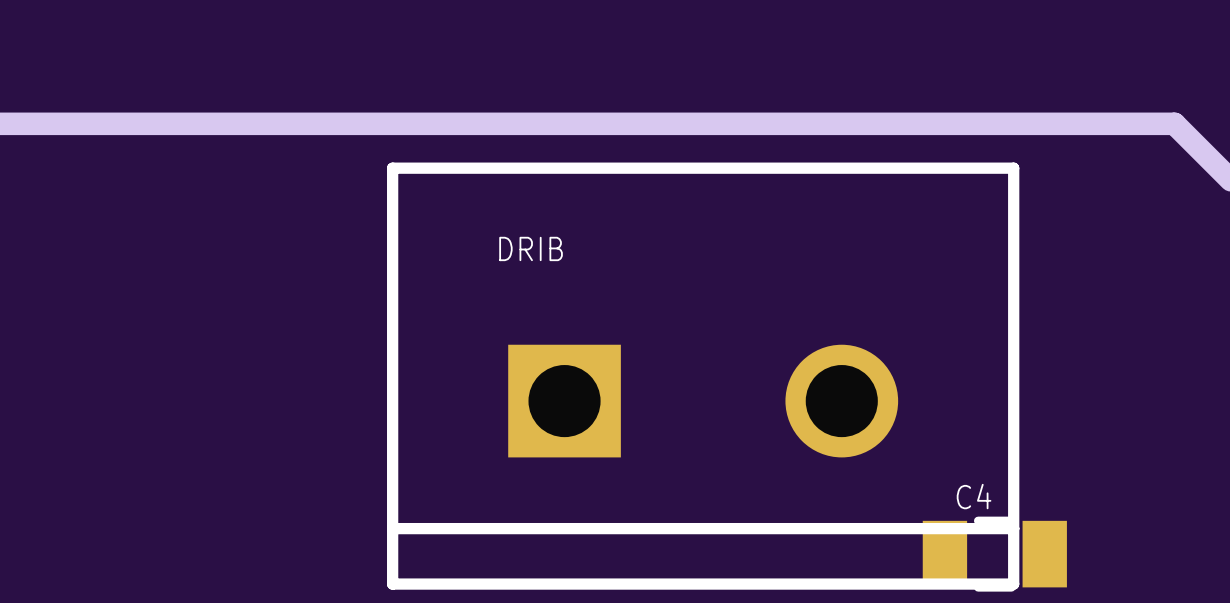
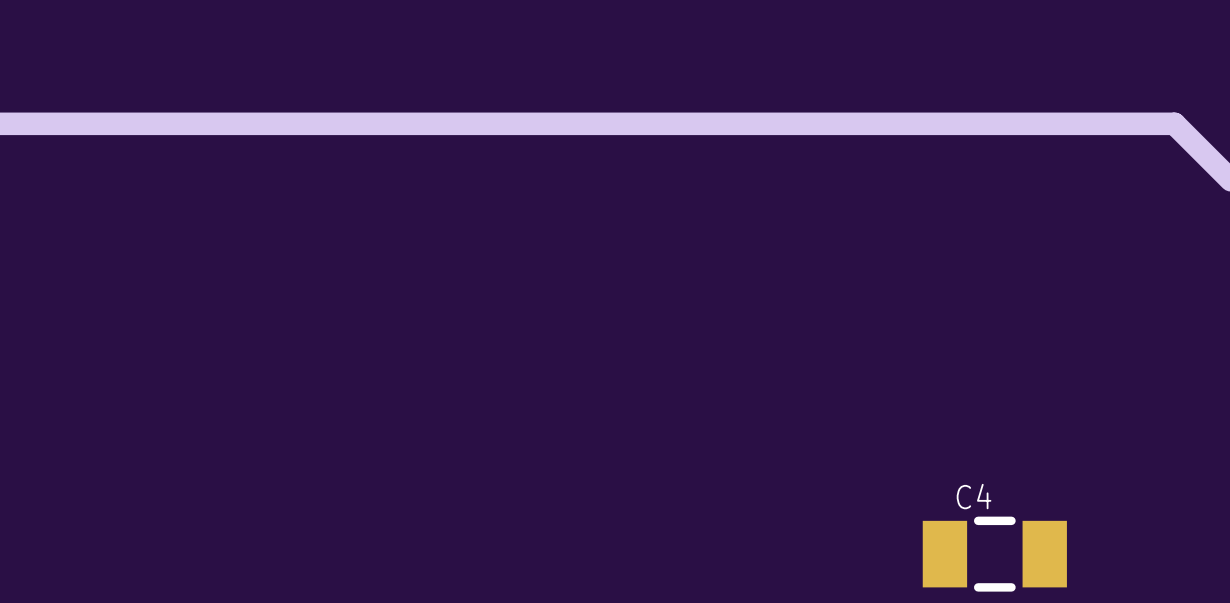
DRIB: (703, 376) -> none

